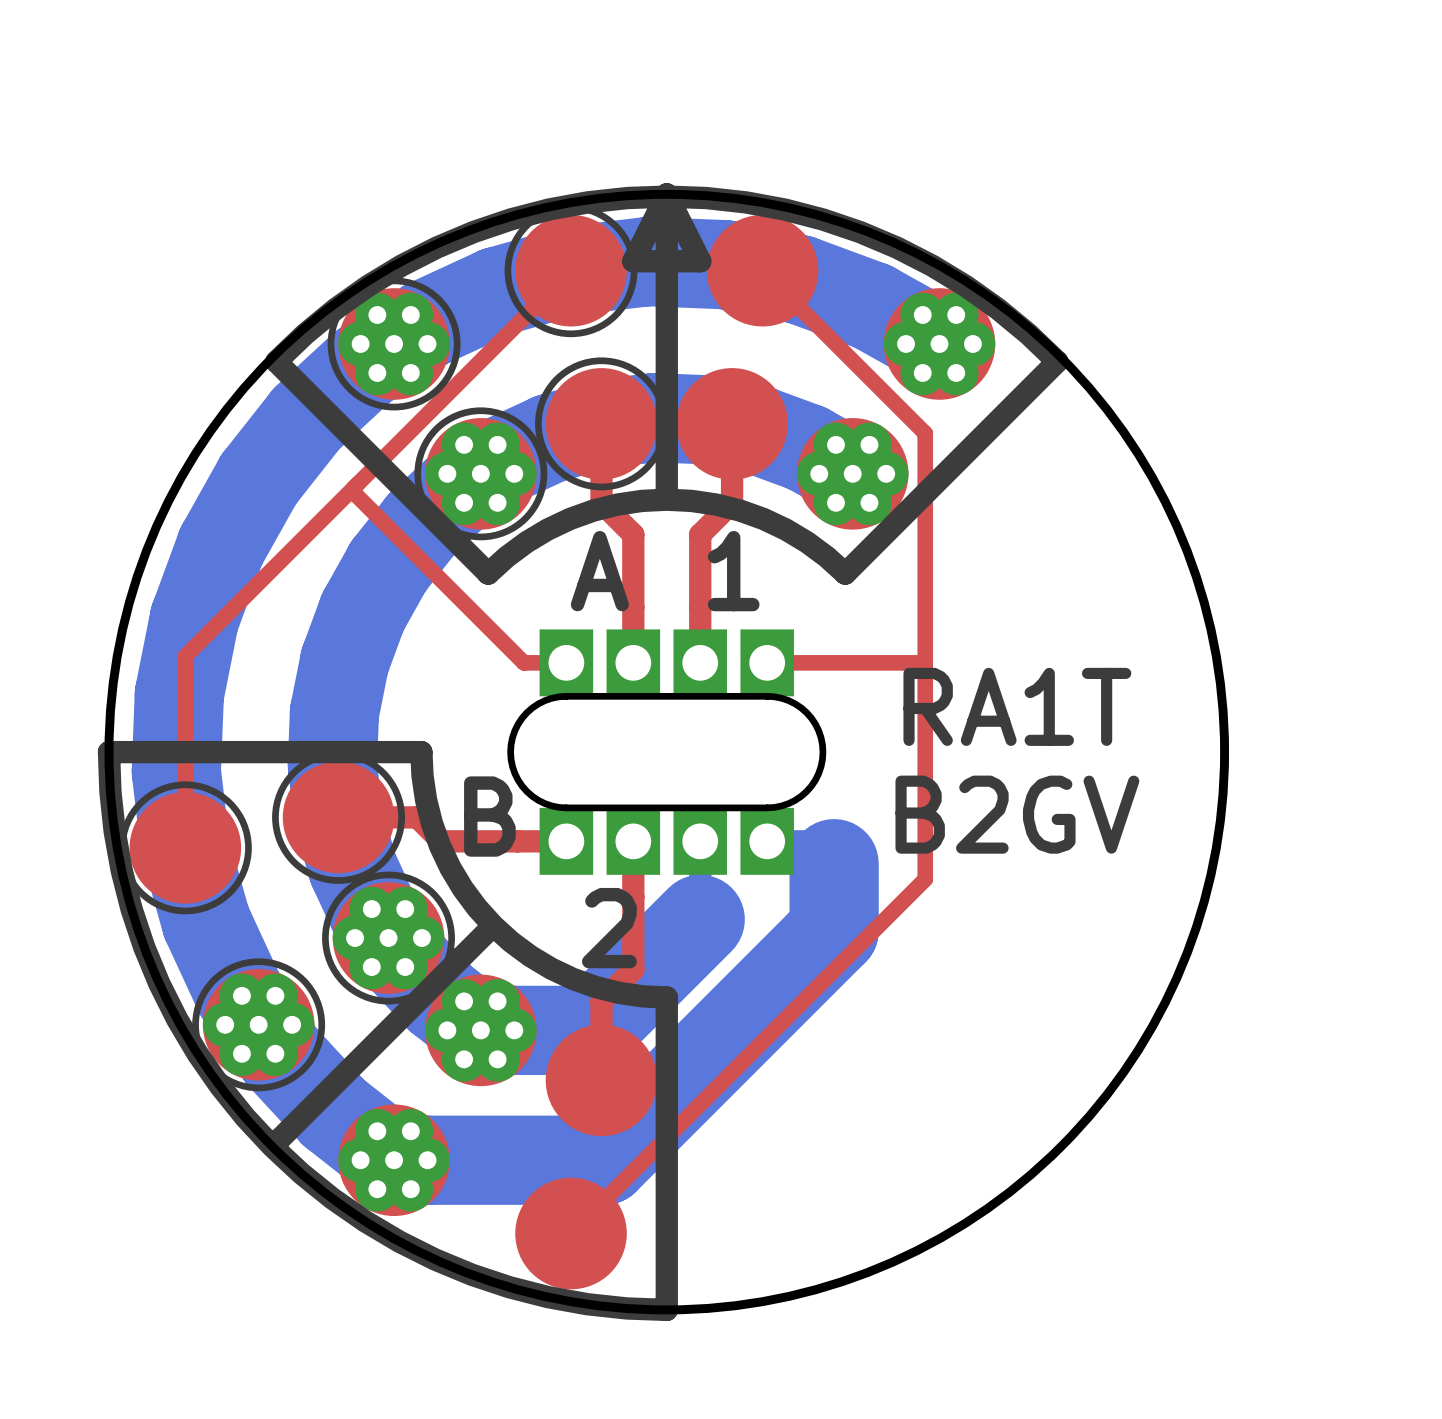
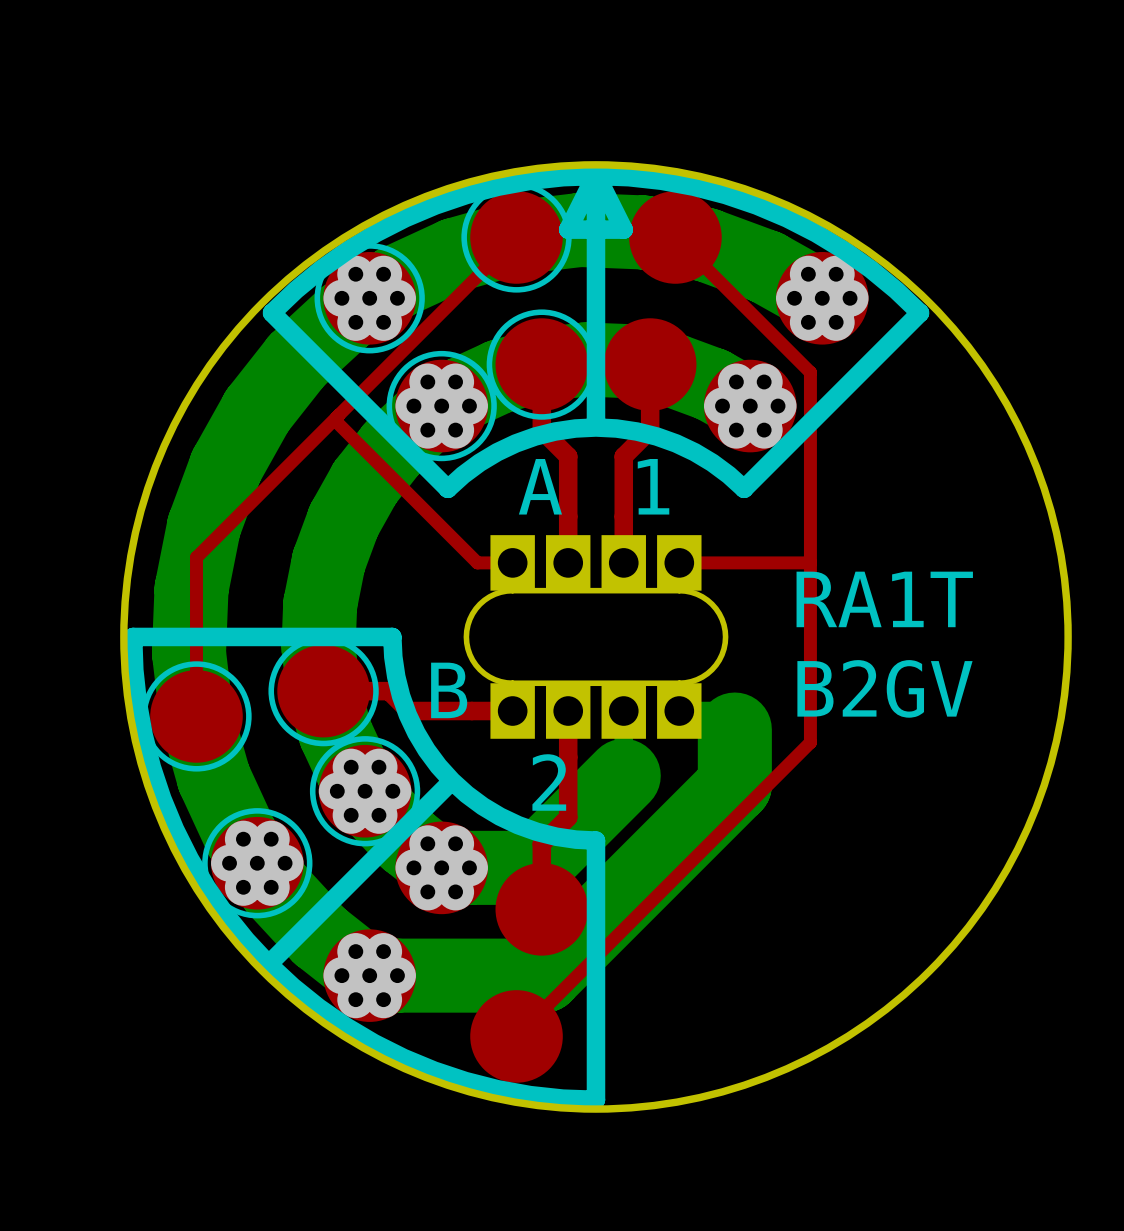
round board edge size: [104, 189, 1230, 1315] -> [120, 161, 1072, 1113]

